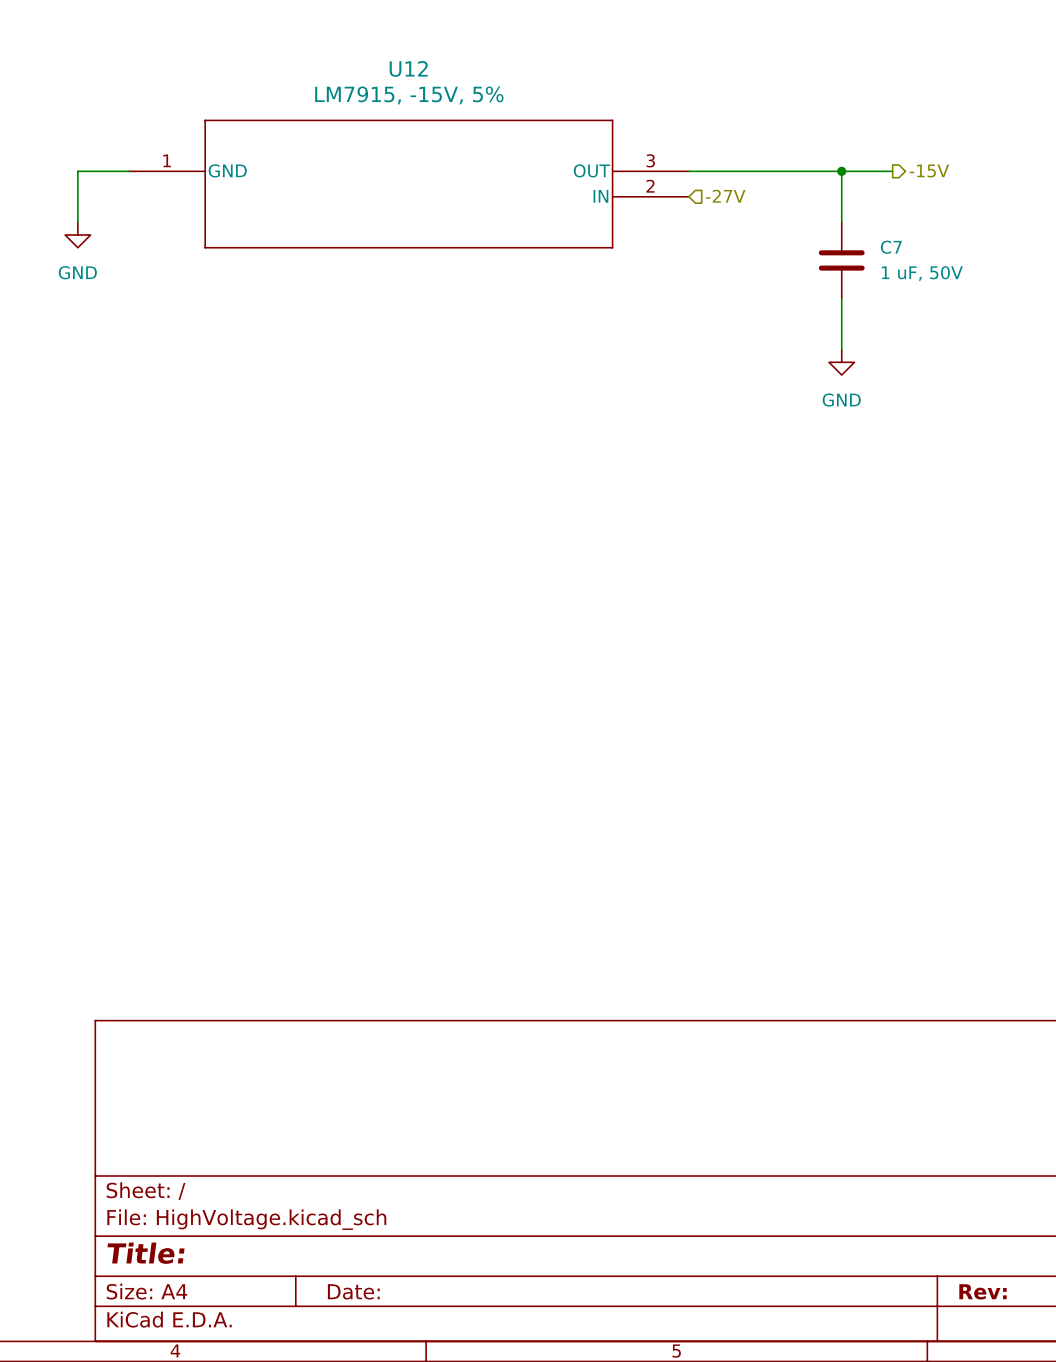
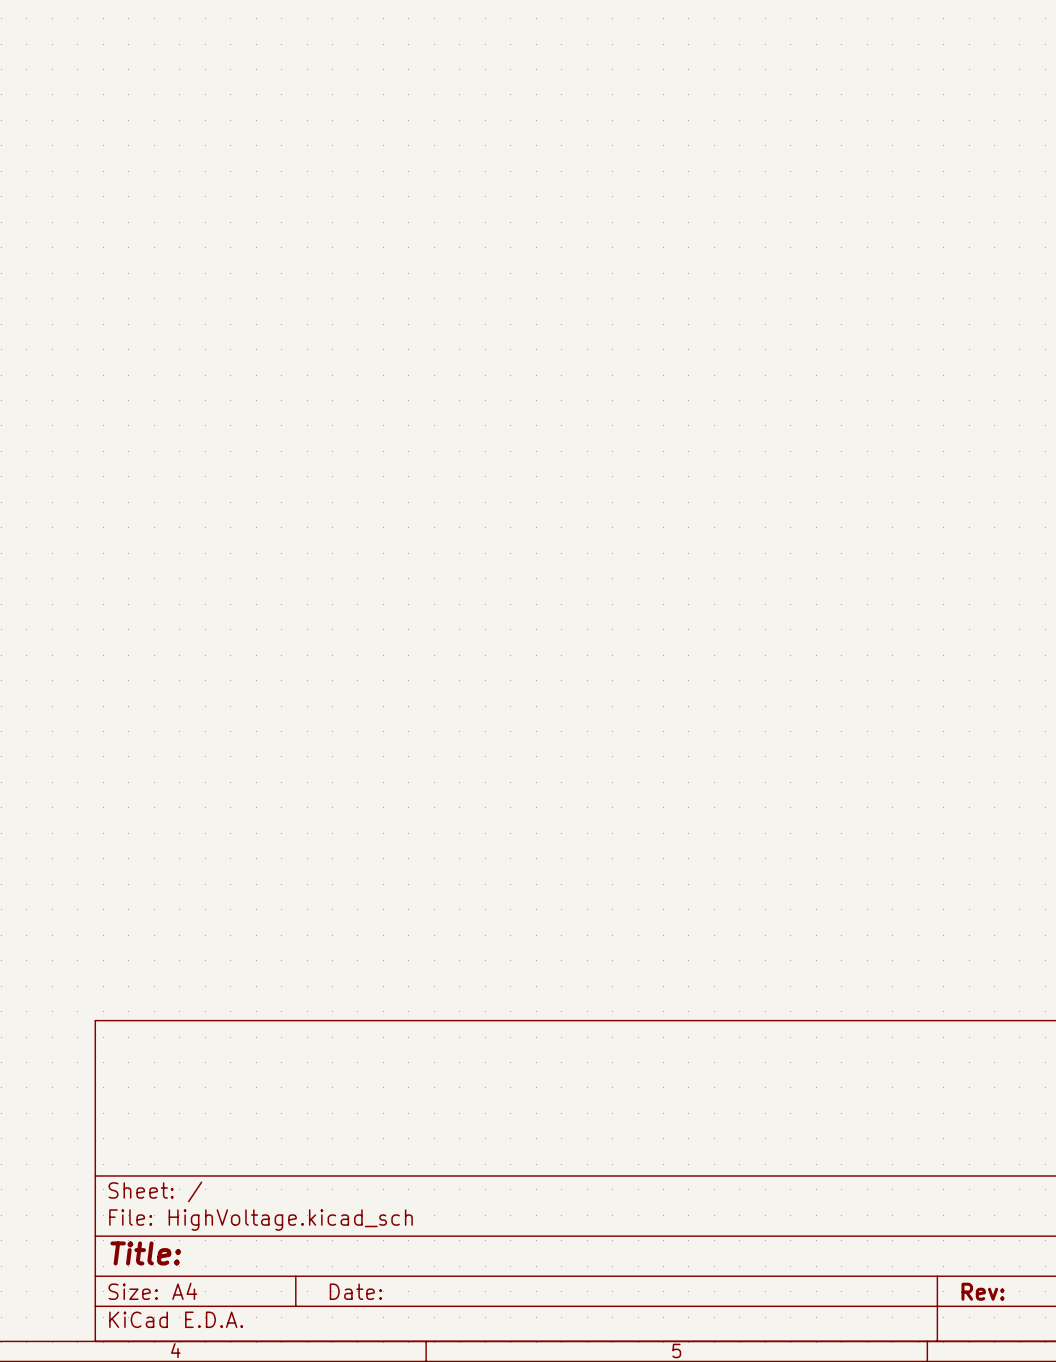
hierarchical label: -15V (929, 170) -> none
wire: (128, 171) (77, 171) (77, 222) -> none
wire: (688, 171) (892, 171) -> none
wire: (841, 171) (841, 222) -> none
junction: (841, 171) -> none
U12: LM7915, -15V, 5% (408, 184) -> none
hierarchical label: -27V (725, 196) -> none
power symbol: GND (77, 235) -> none
C7: 1 uF, 50V (841, 260) -> none
wire: (841, 298) (841, 349) -> none
power symbol: GND (841, 362) -> none

